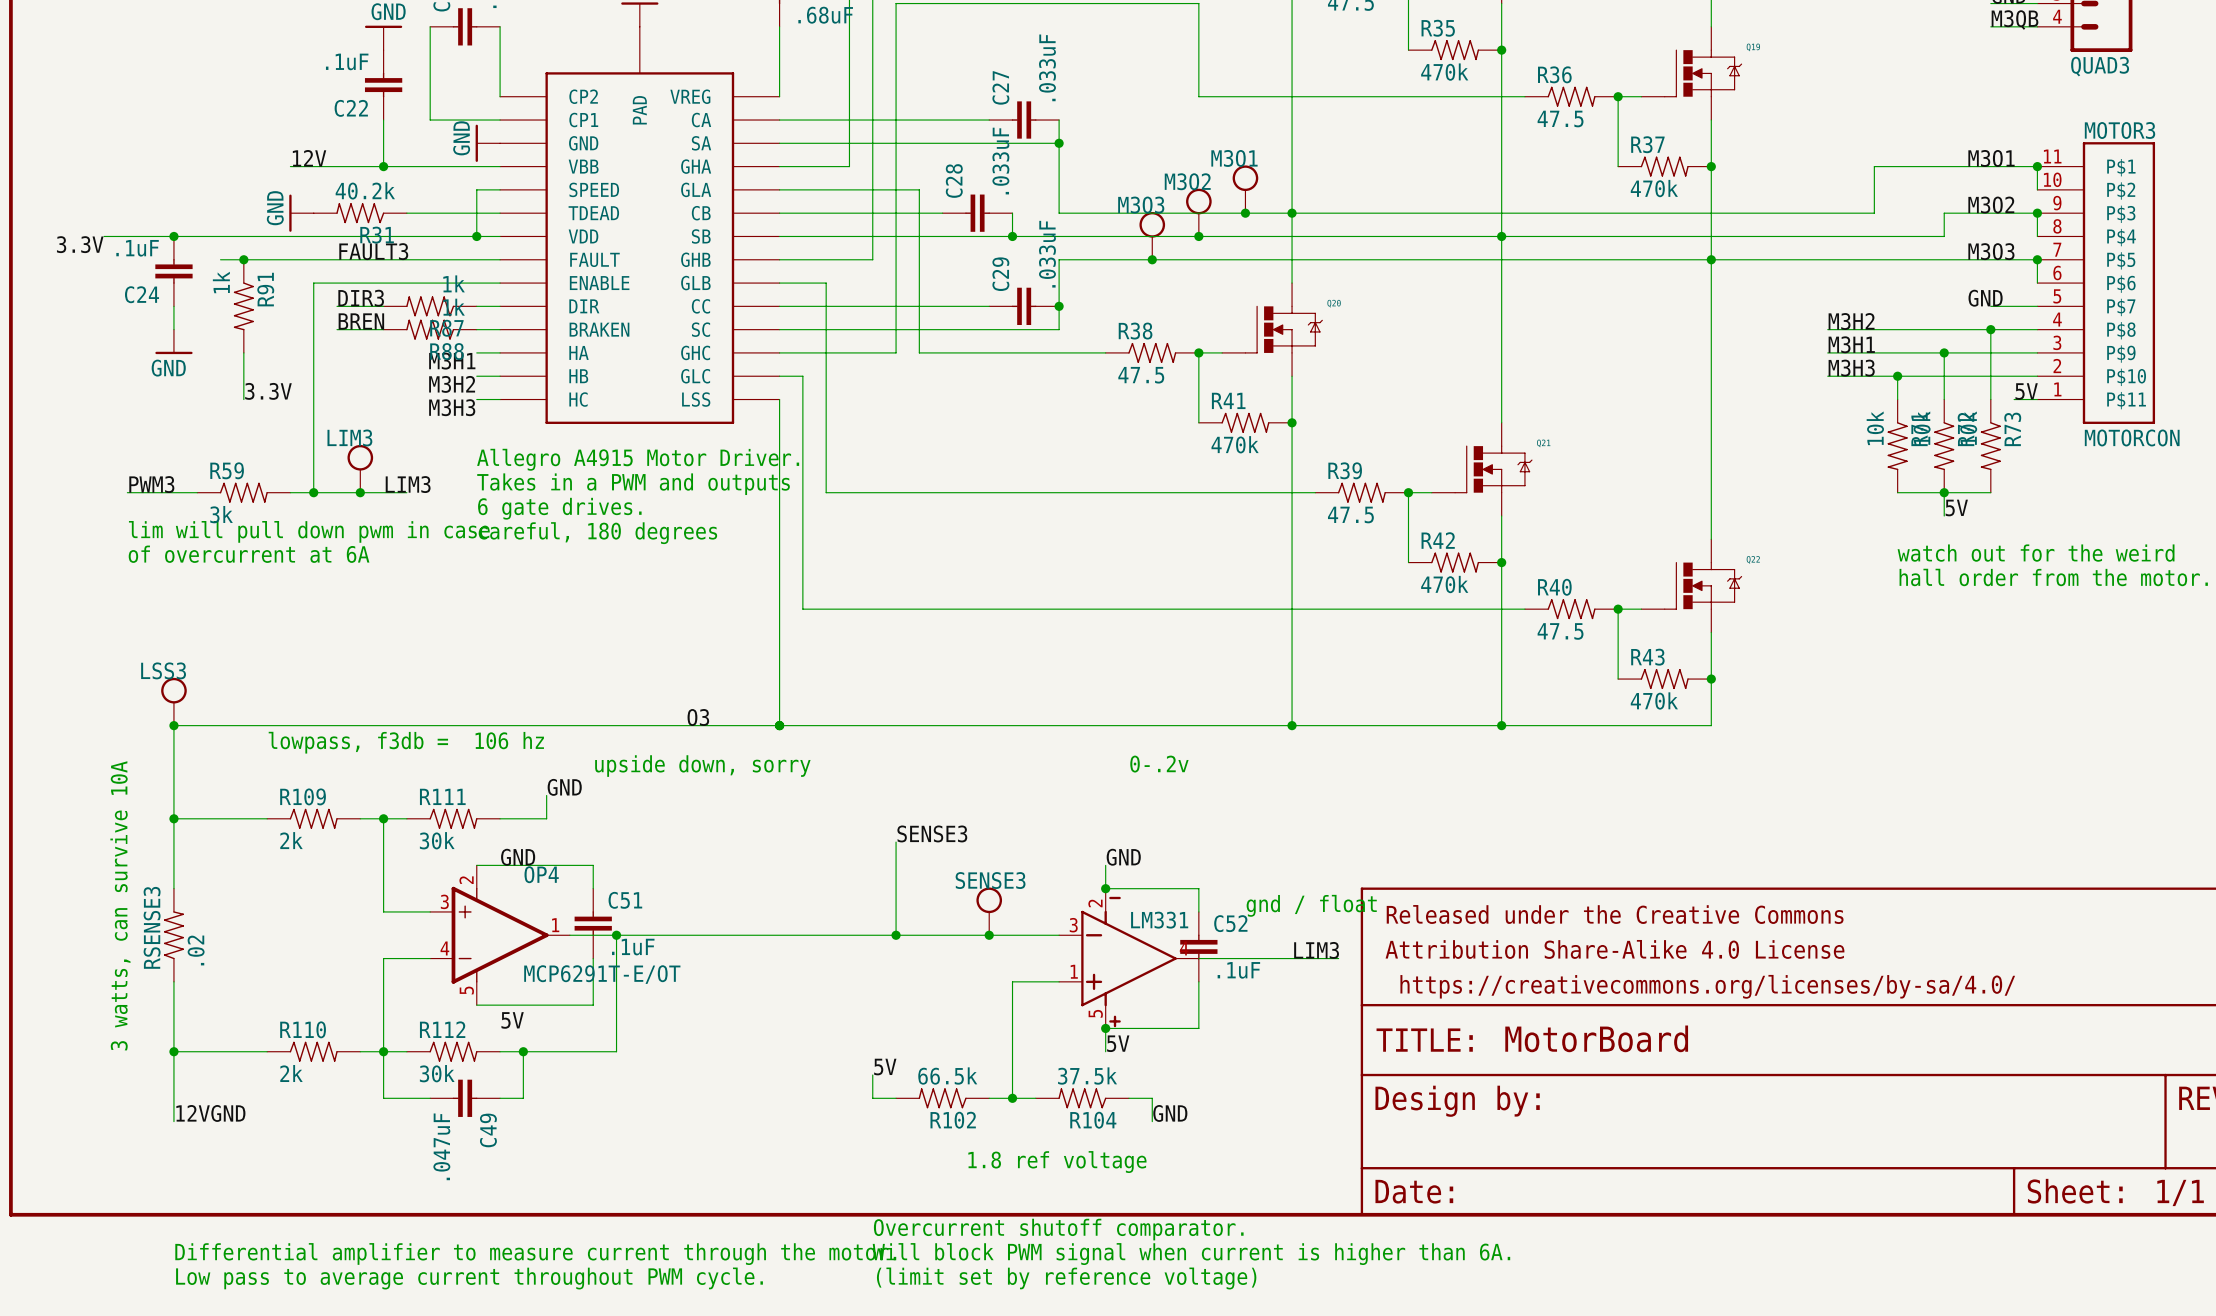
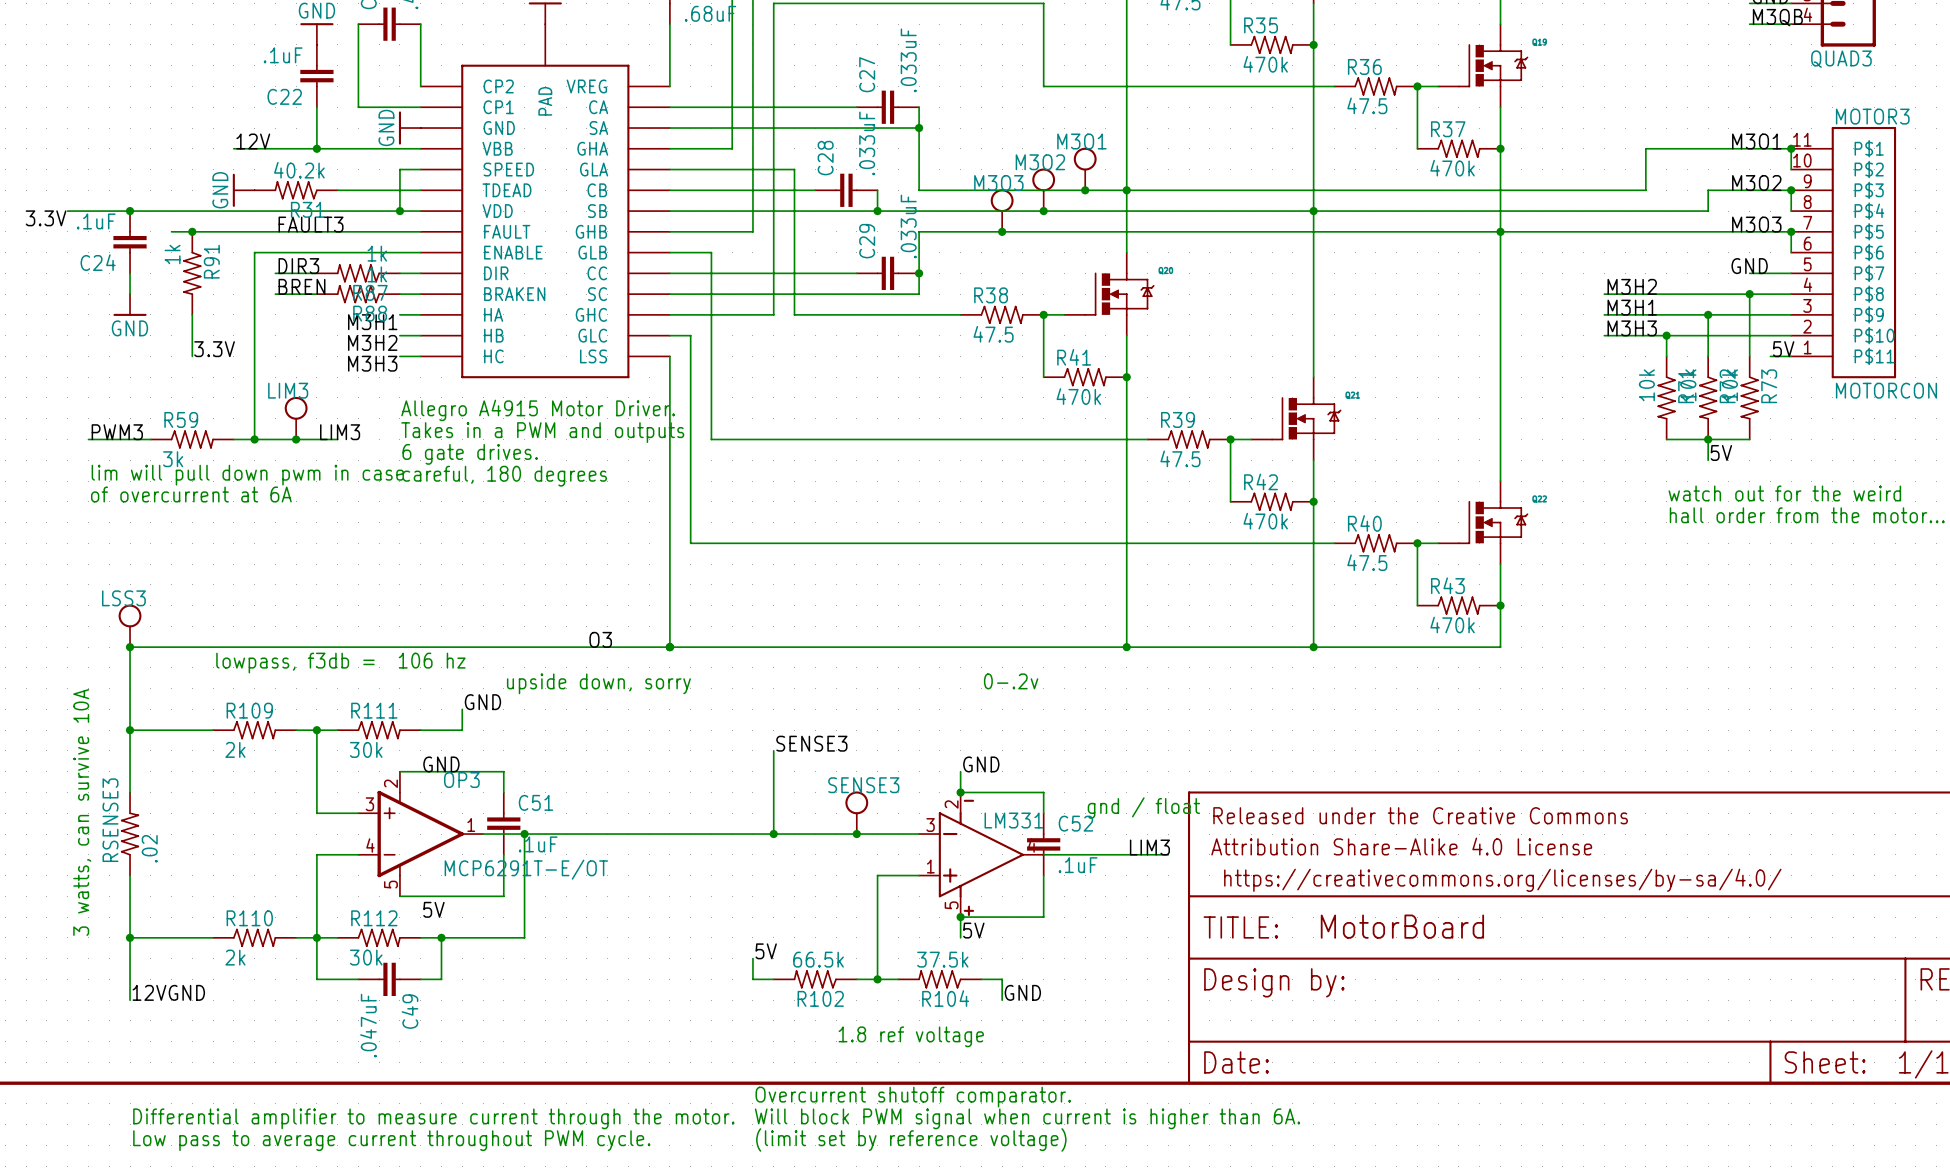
OP4 name: OP4 (541, 874) -> OP3 (461, 780)

